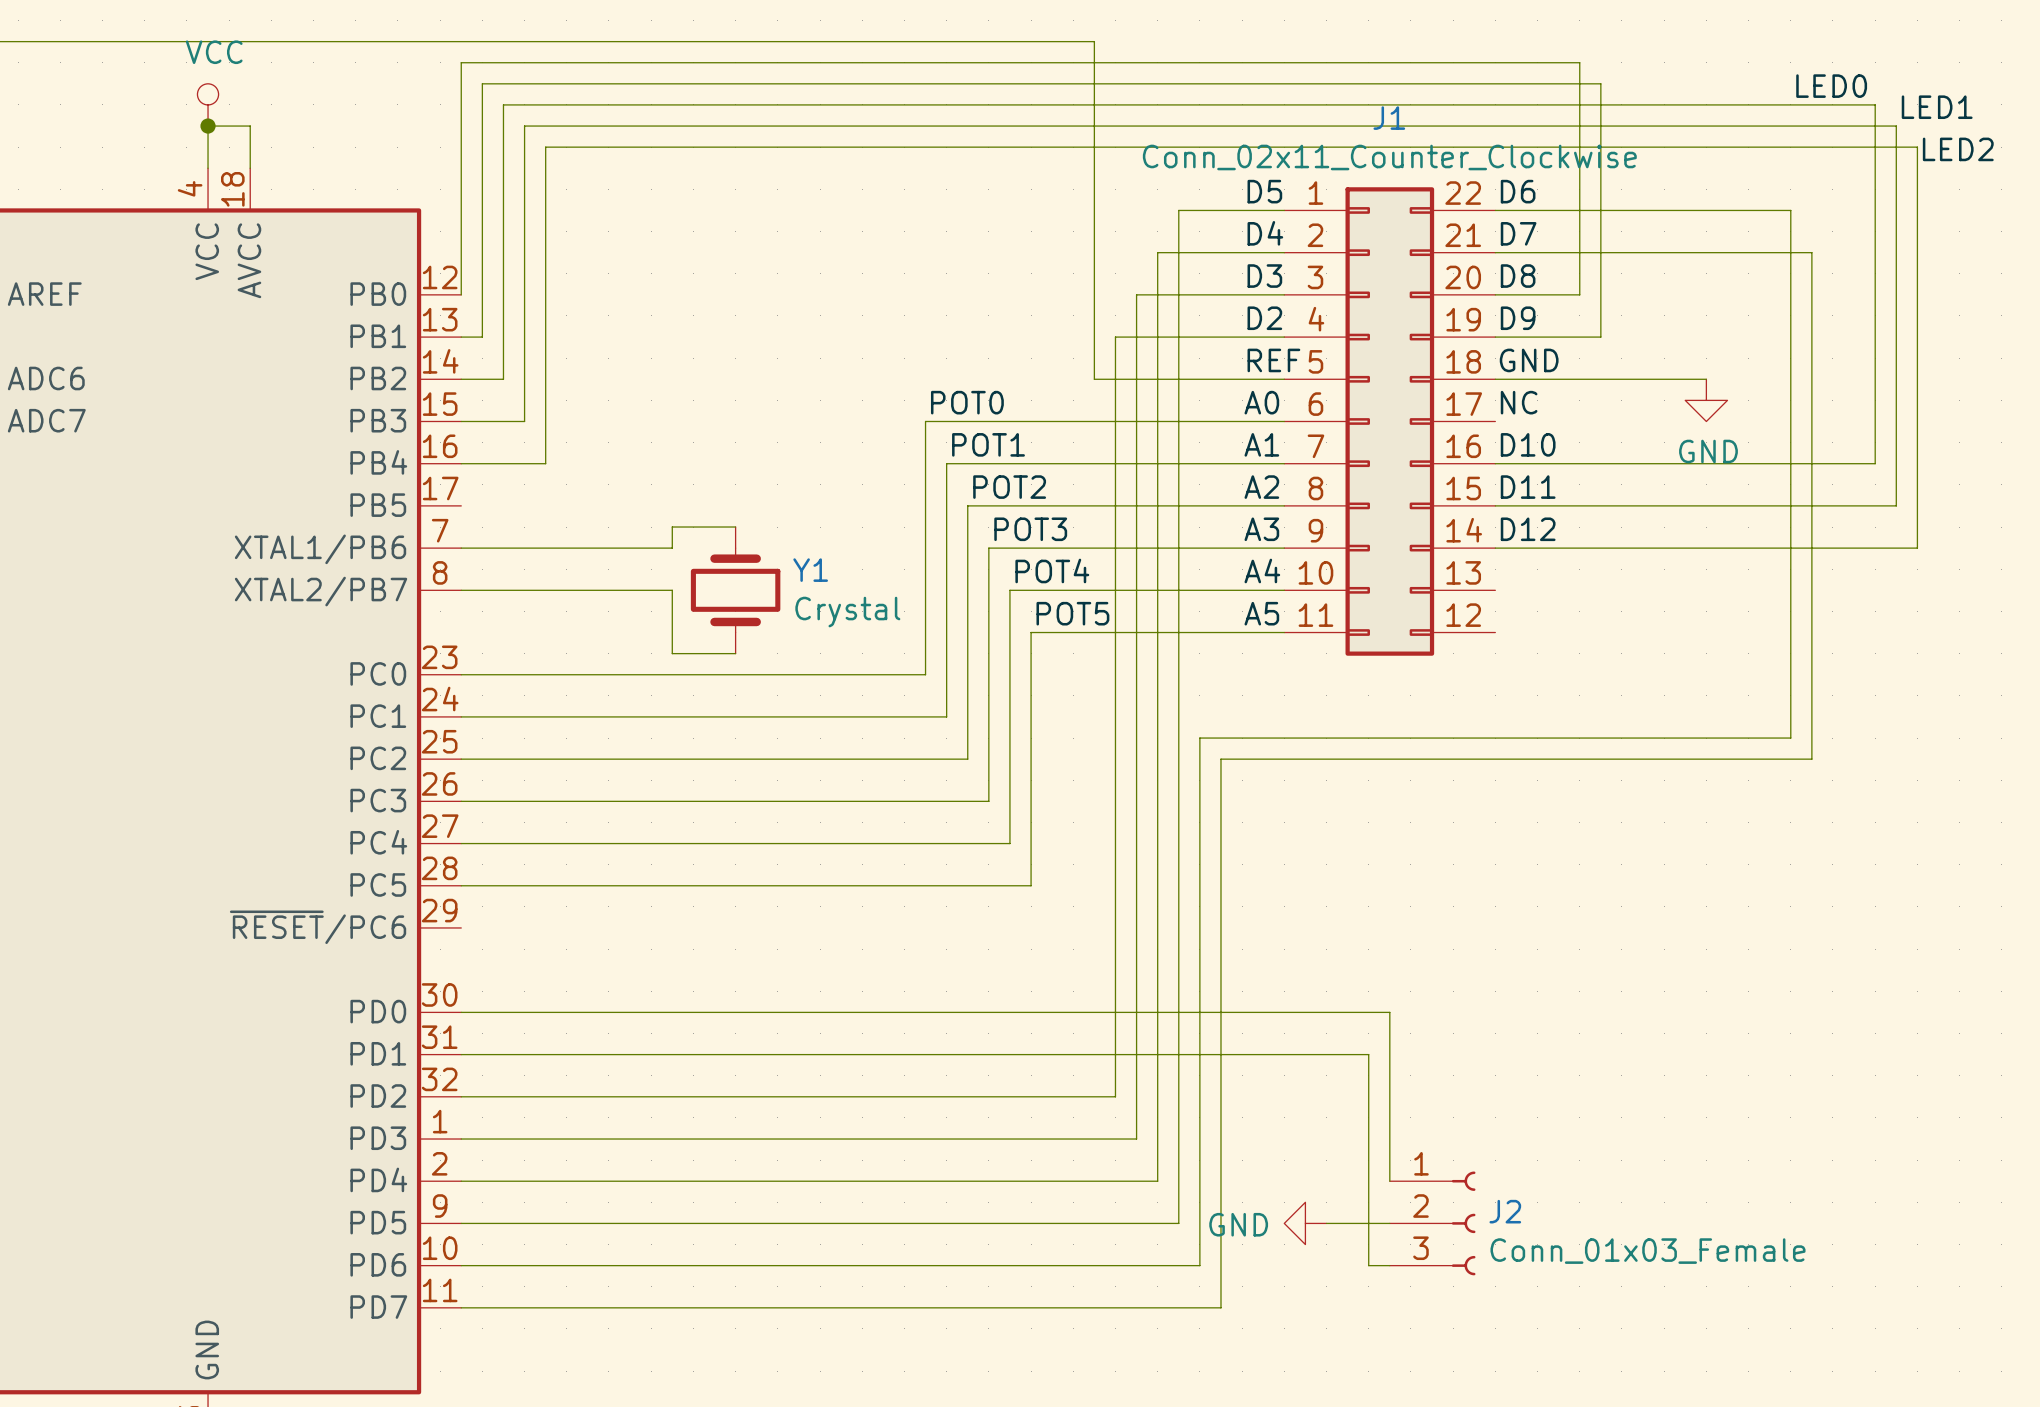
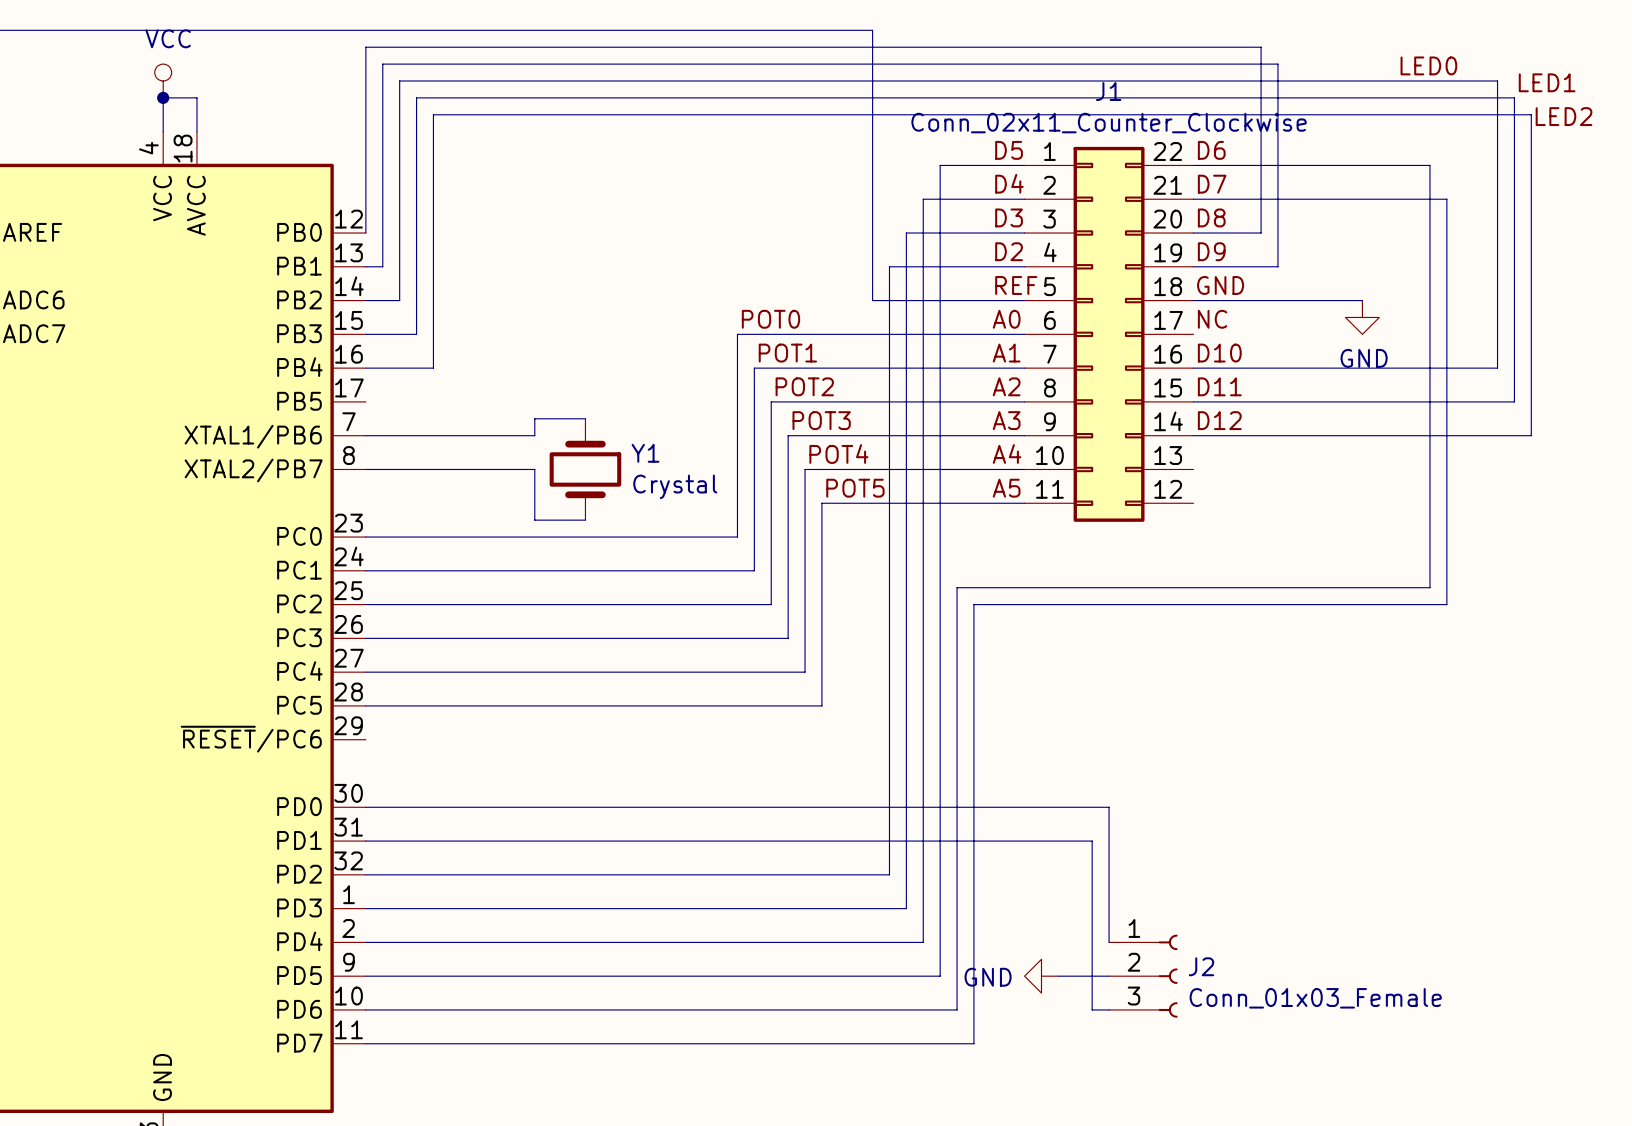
label position: LED0 (1831, 86) -> LED0 (1428, 65)

